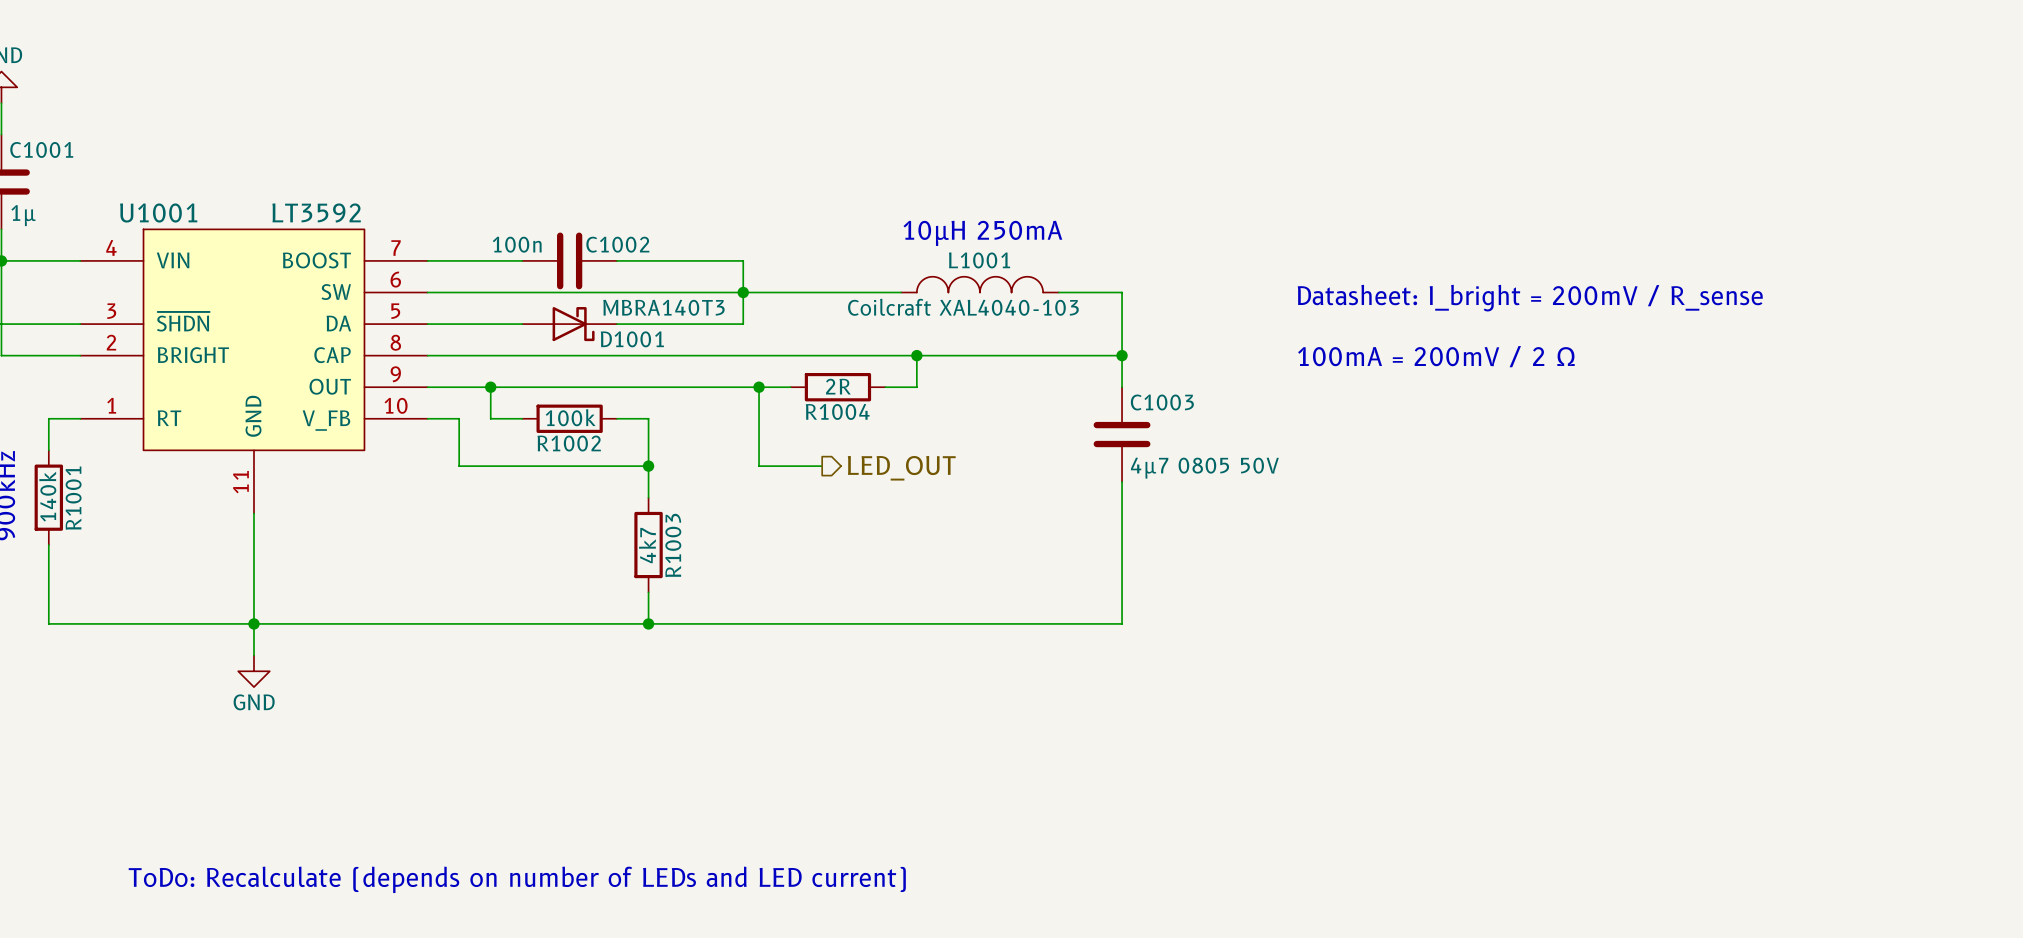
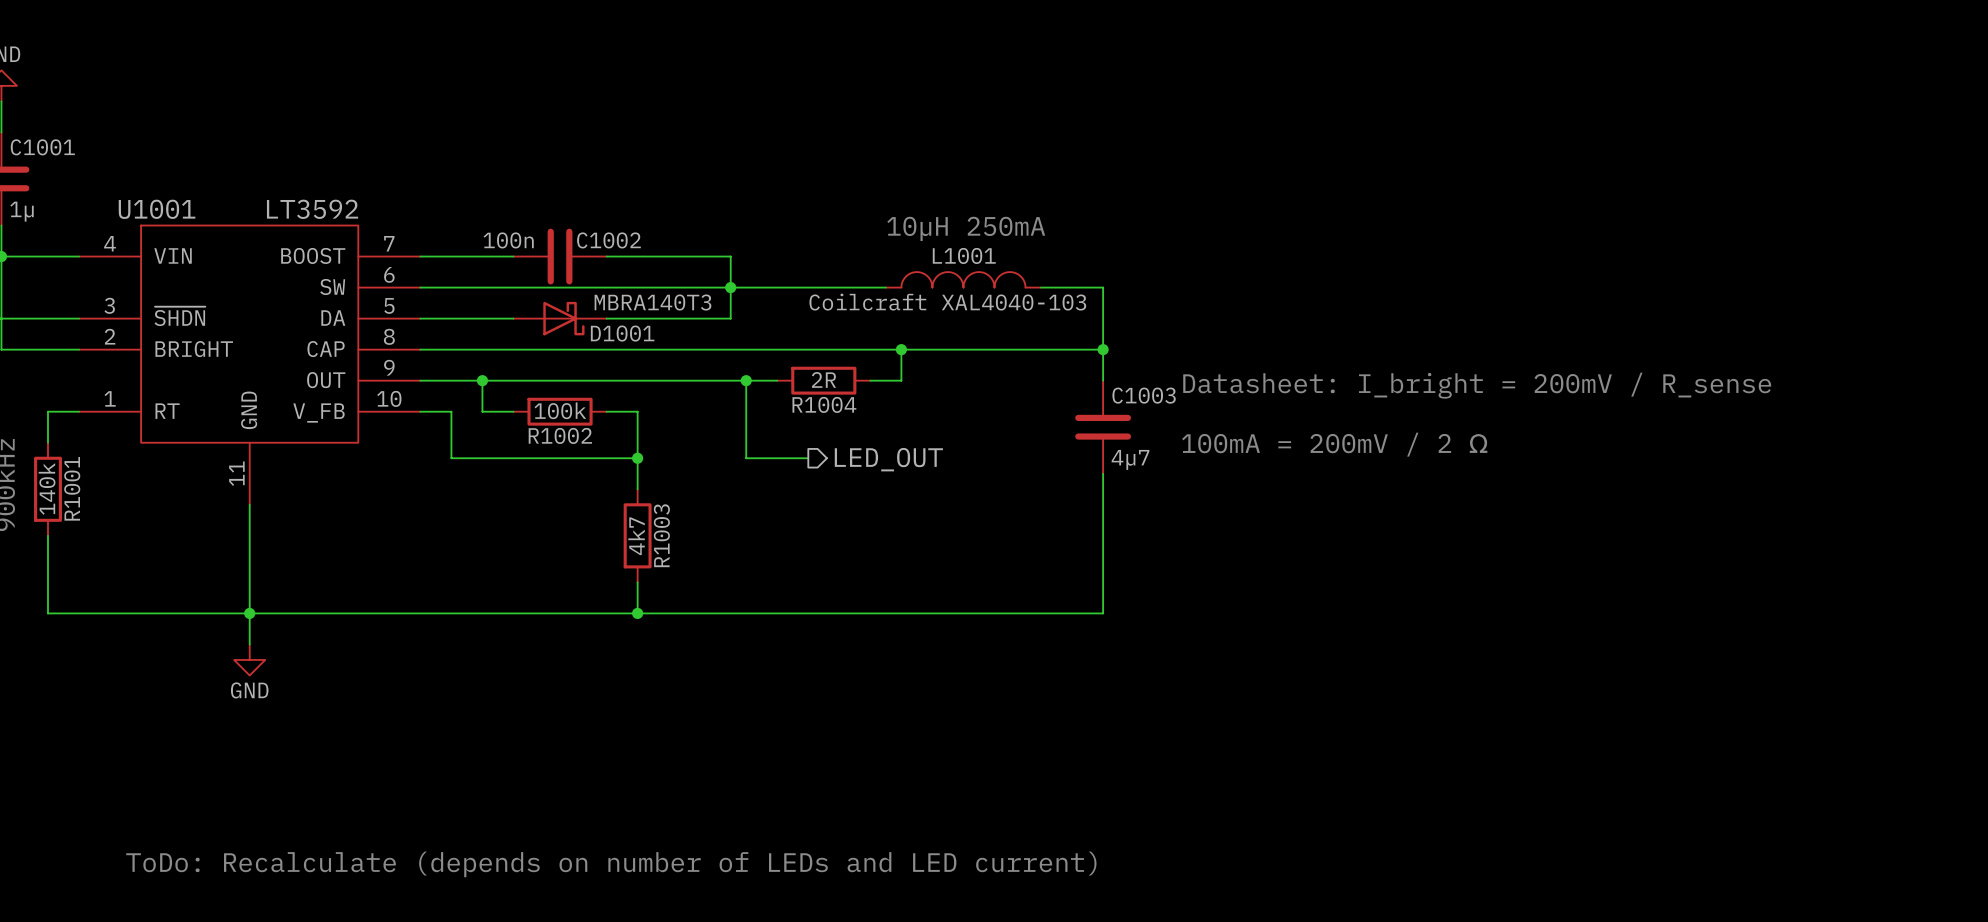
text position: Datasheet: I_bright = 200mV / R_sense (1530, 298) -> Datasheet: I_bright = 200mV / R_sense (1477, 385)
text position: 100mA = 200mV / 2 Ω (1436, 356) -> 100mA = 200mV / 2 Ω (1334, 444)
C1003 value: 4µ7 0805 50V (1204, 468) -> 4µ7 (1130, 459)

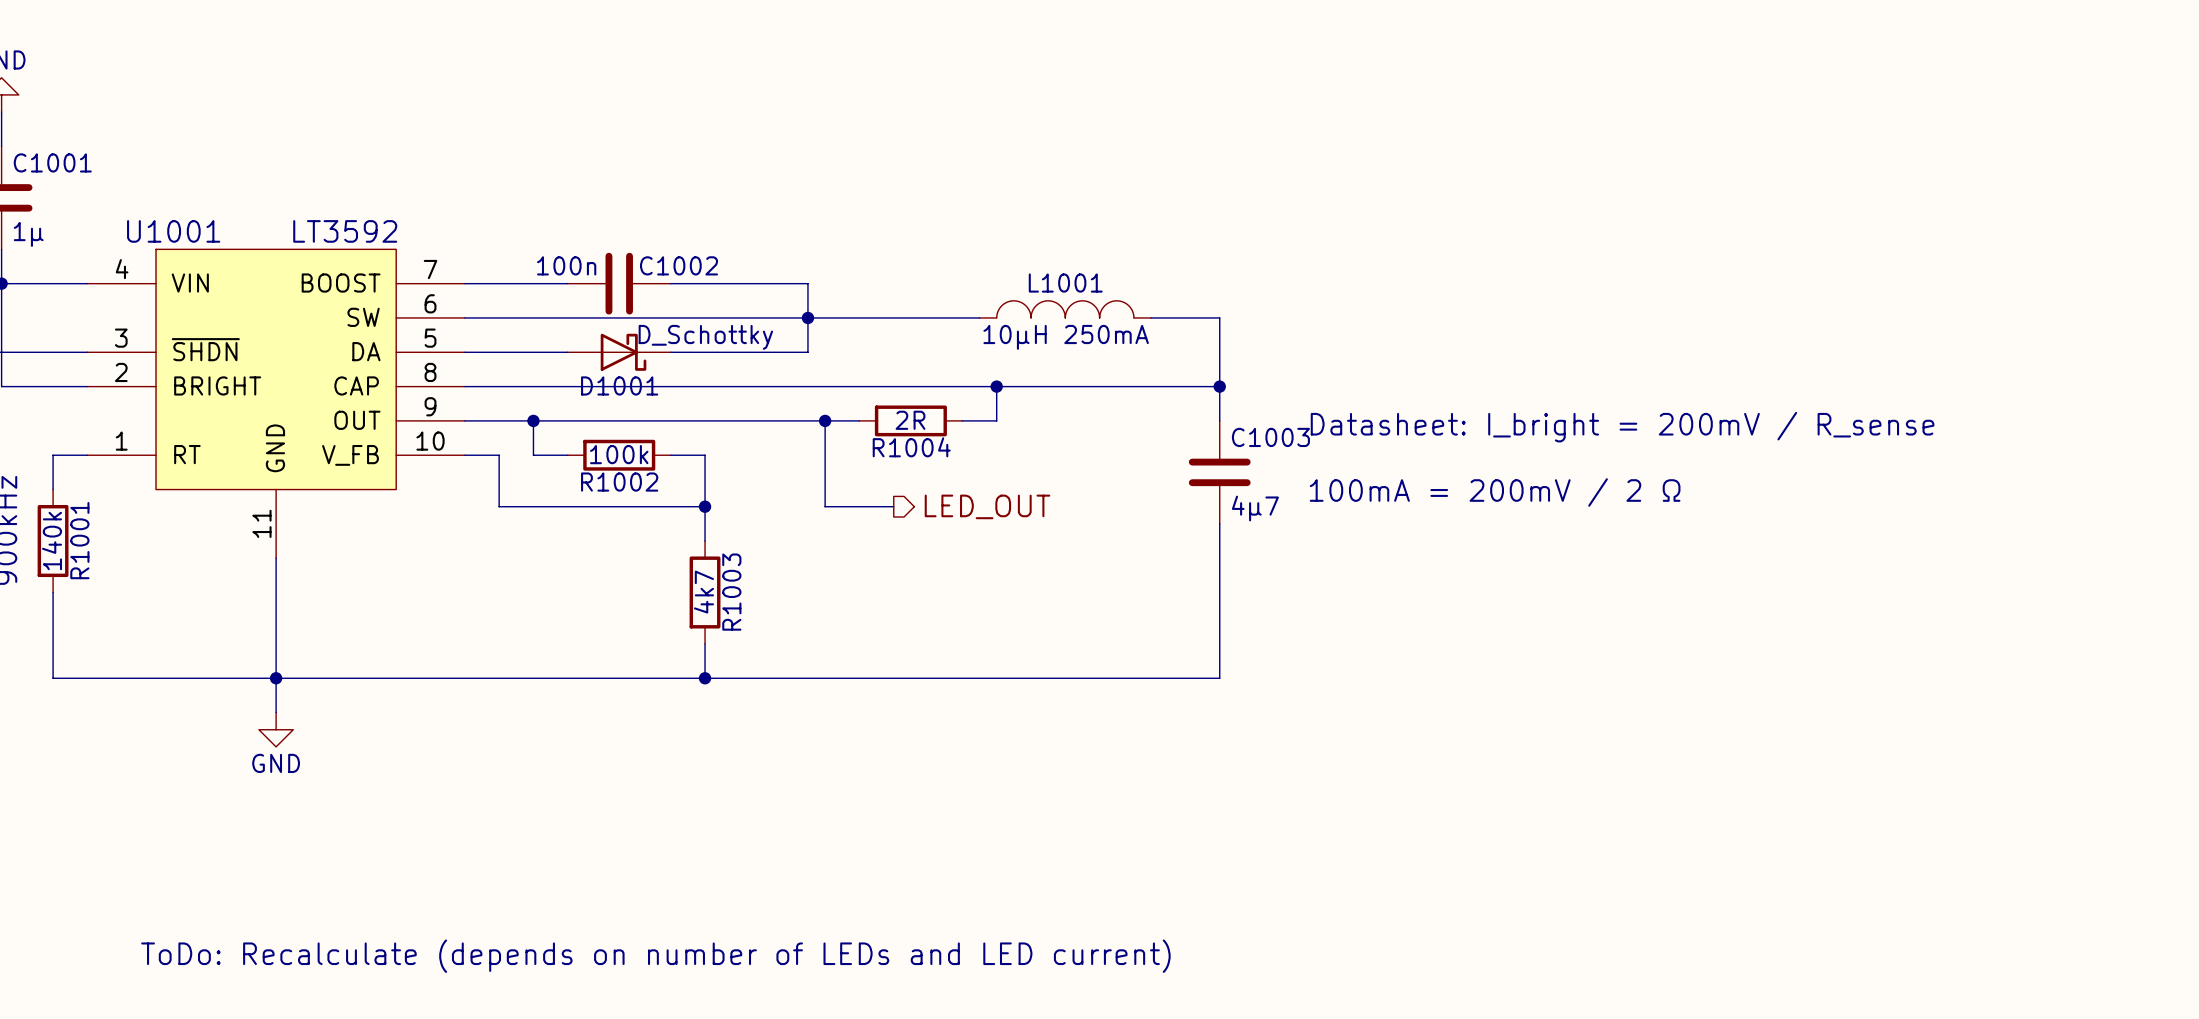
text: 10µH 250mA (966, 228) -> none
D1001 value: MBRA140T3 (652, 302) -> D_Schottky (705, 337)
L1001 value: Coilcraft XAL4040-103 (947, 302) -> 10µH 250mA (1066, 337)
D1001 name position: D1001 (622, 333) -> D1001 (619, 385)

